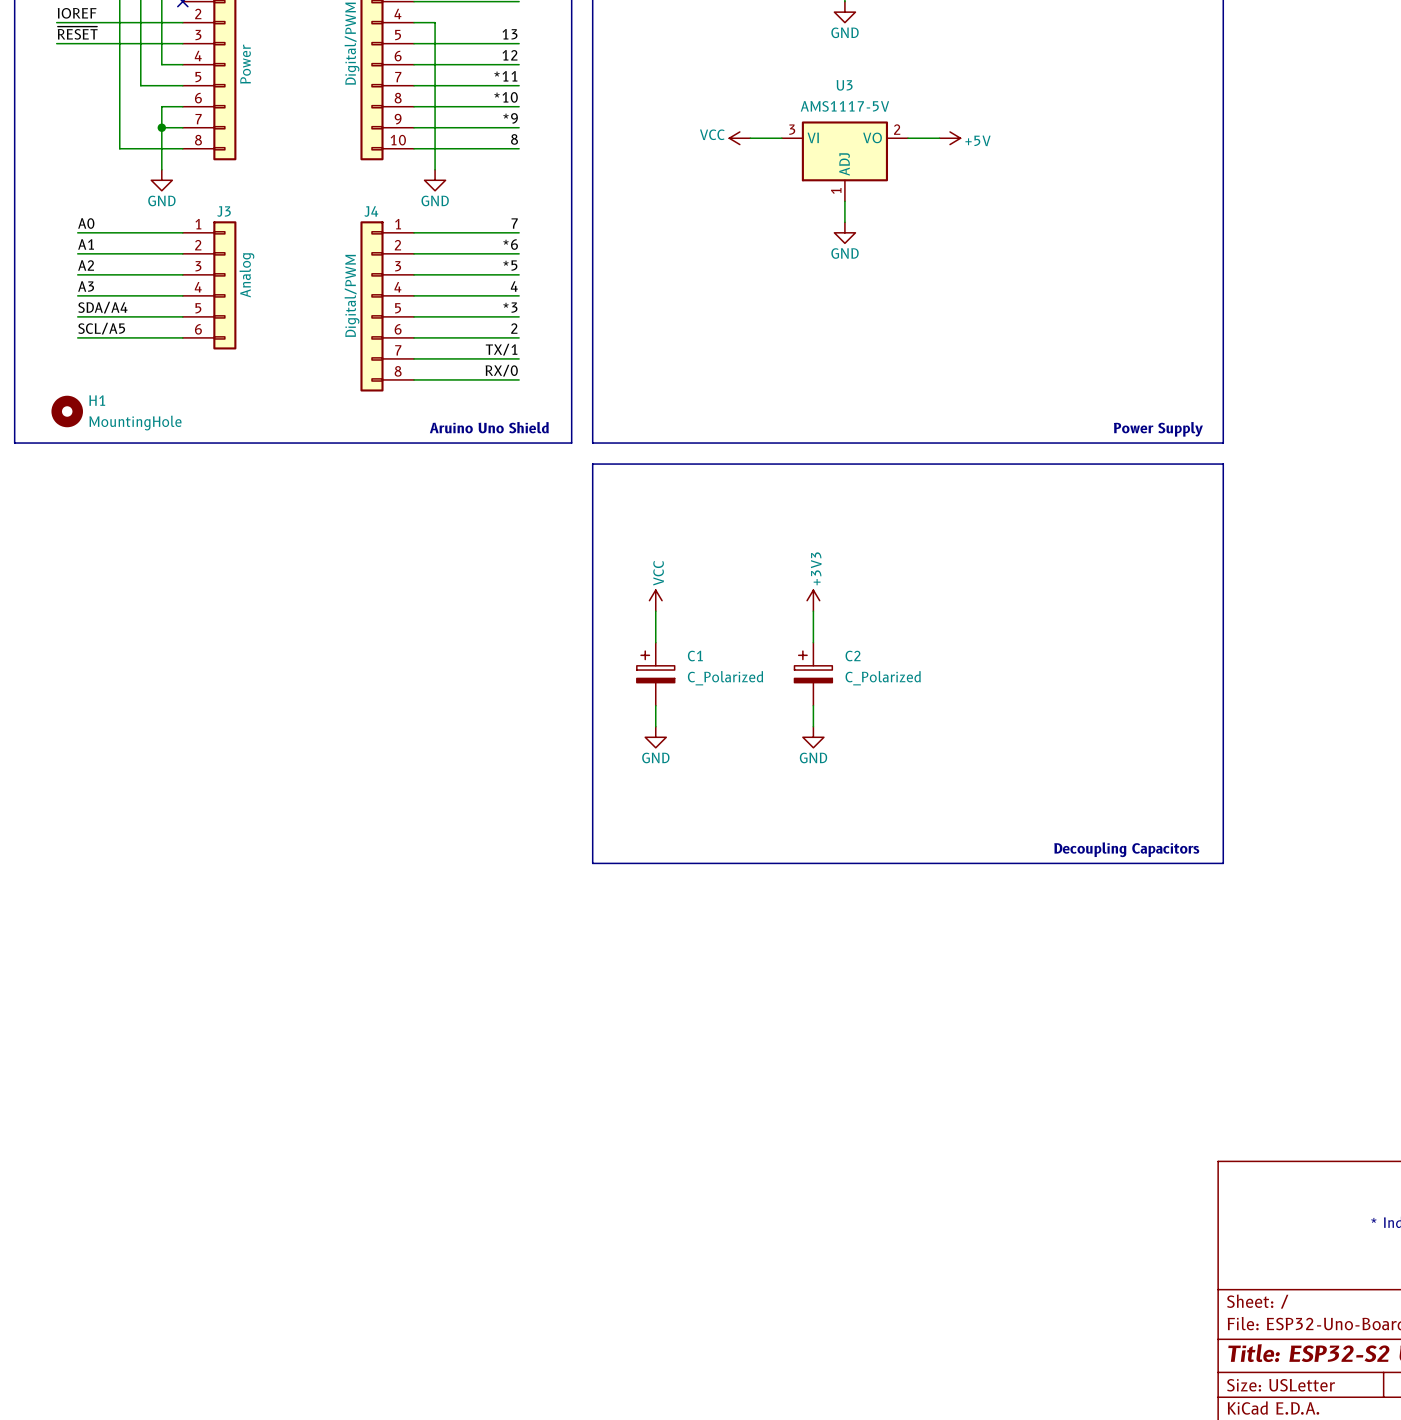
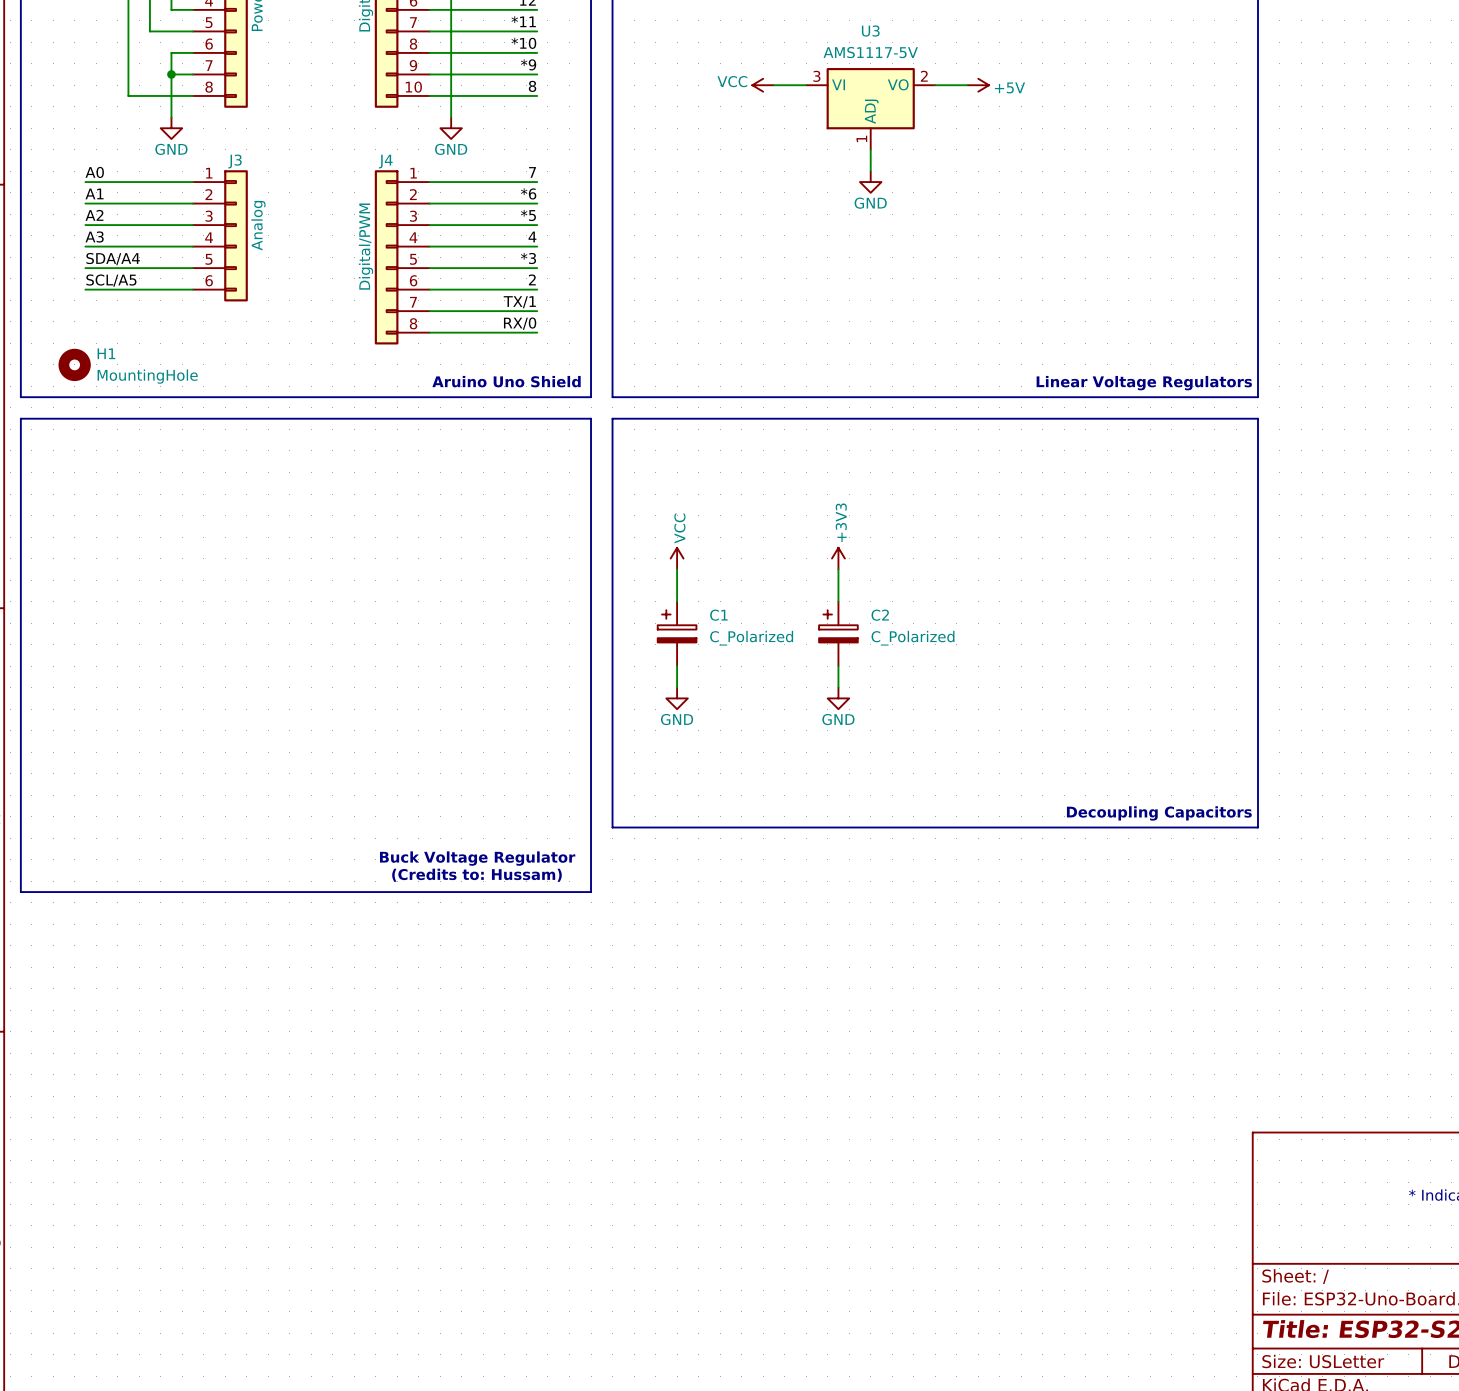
text: none -> Linear Voltage Regulators (1144, 383)
text: Power Supply (1158, 429) -> none
line: none -> (20, 418) (591, 418) (591, 892) (20, 892) (20, 418)
text: none -> Buck Voltage Regulator (477, 858)
text: none -> (Credits to: Hussam) (476, 875)

